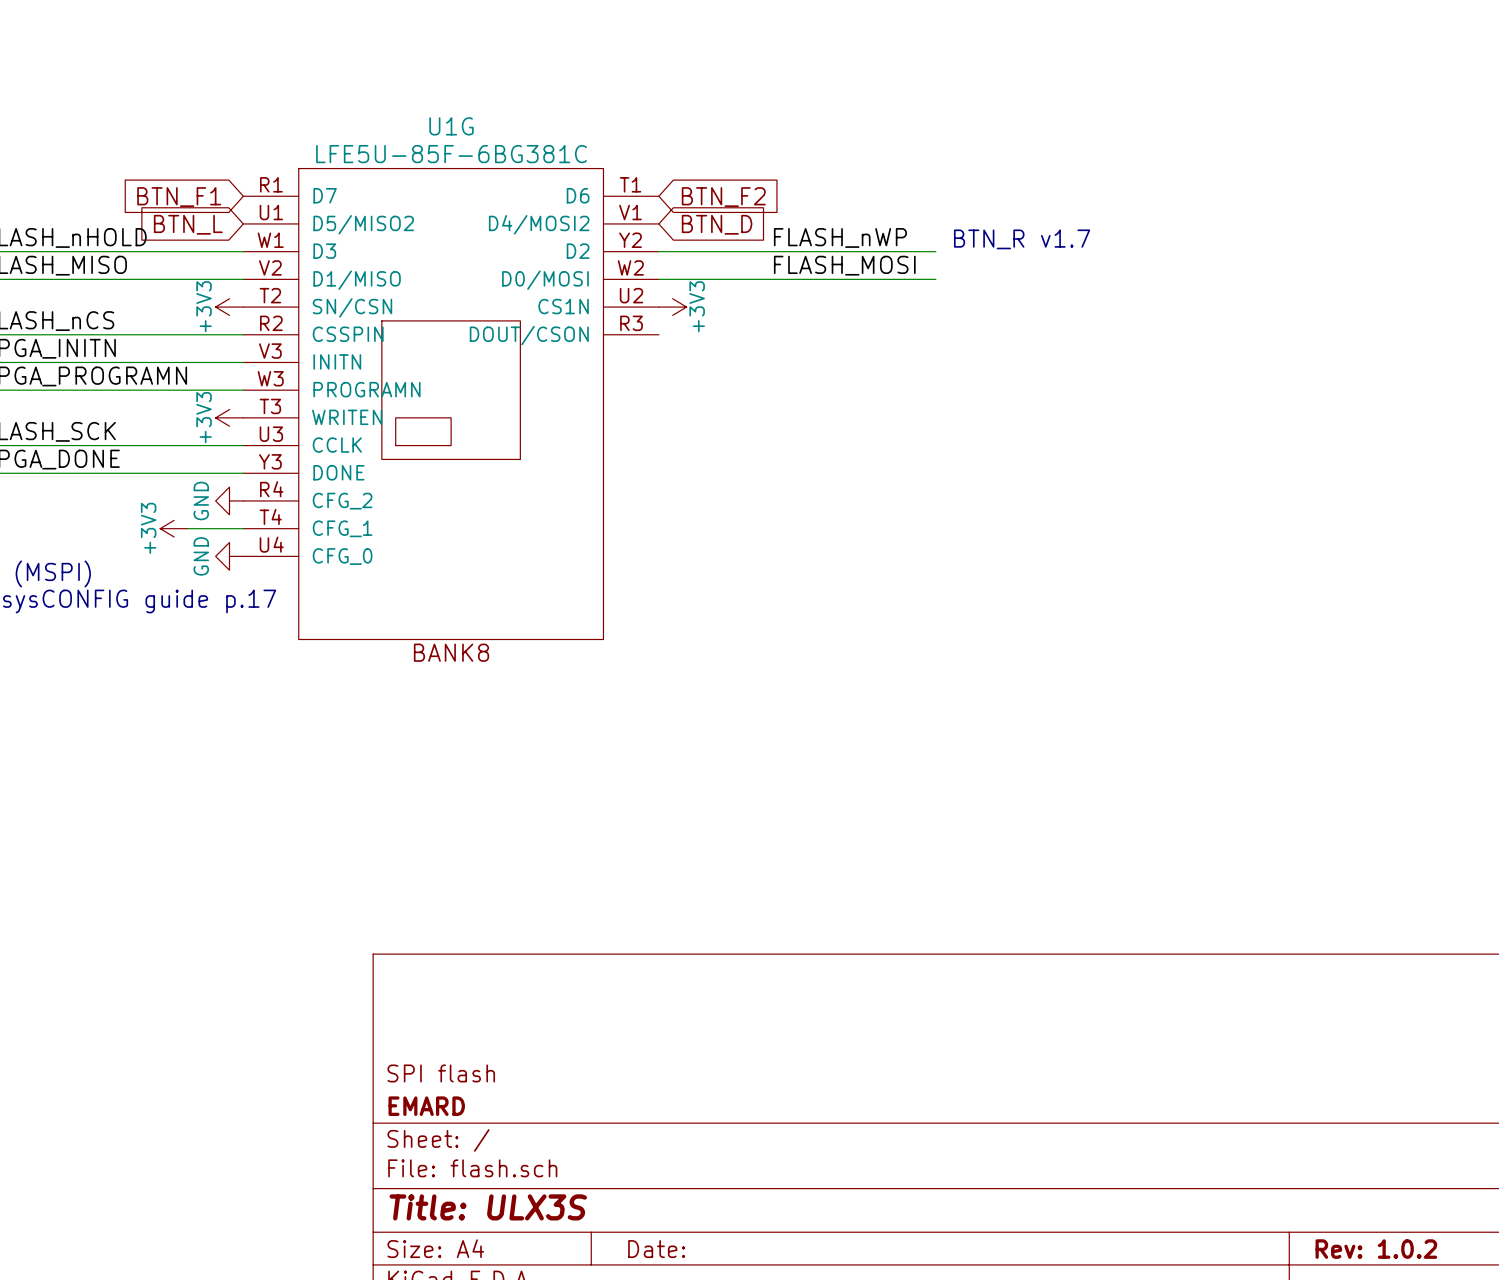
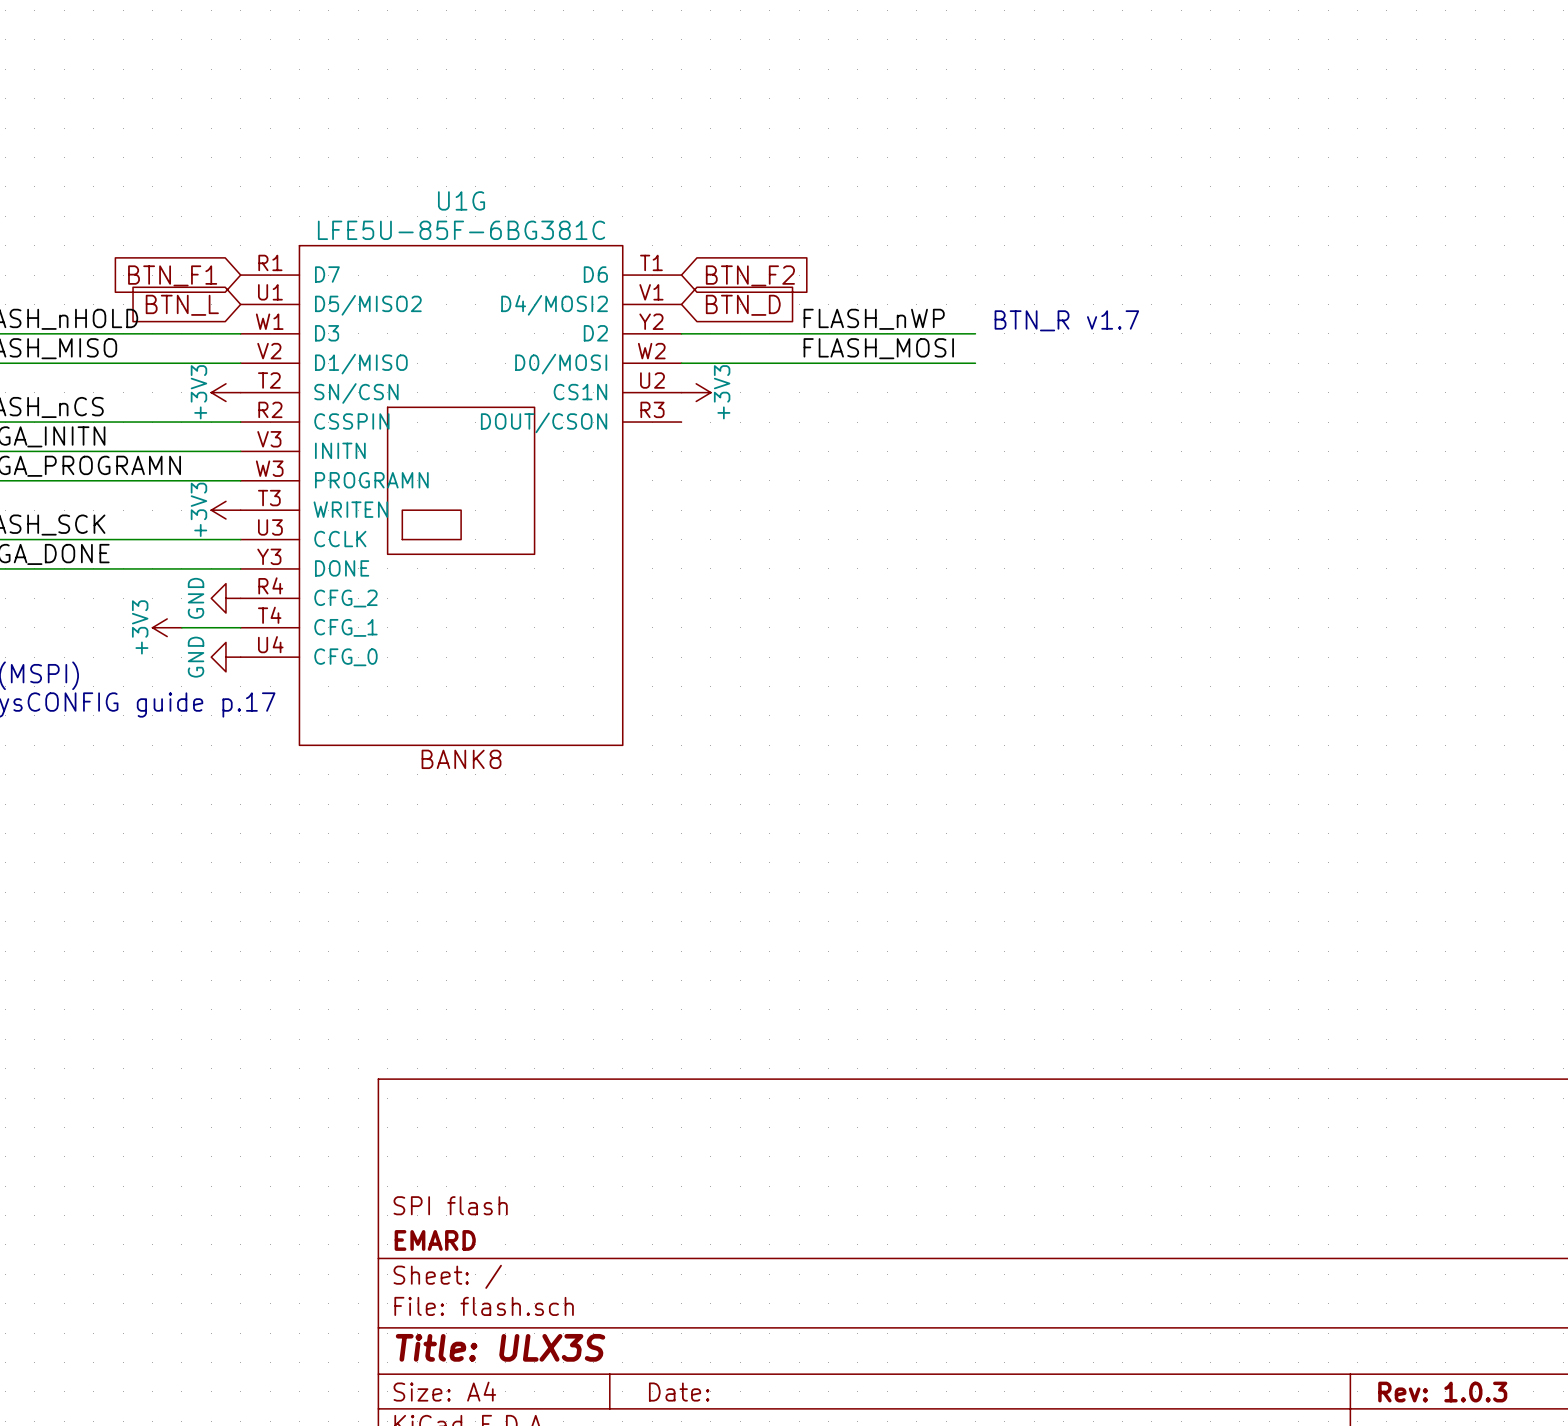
title block: Rev: 1.0.2 (1376, 1249) -> Rev: 1.0.3 (1442, 1392)

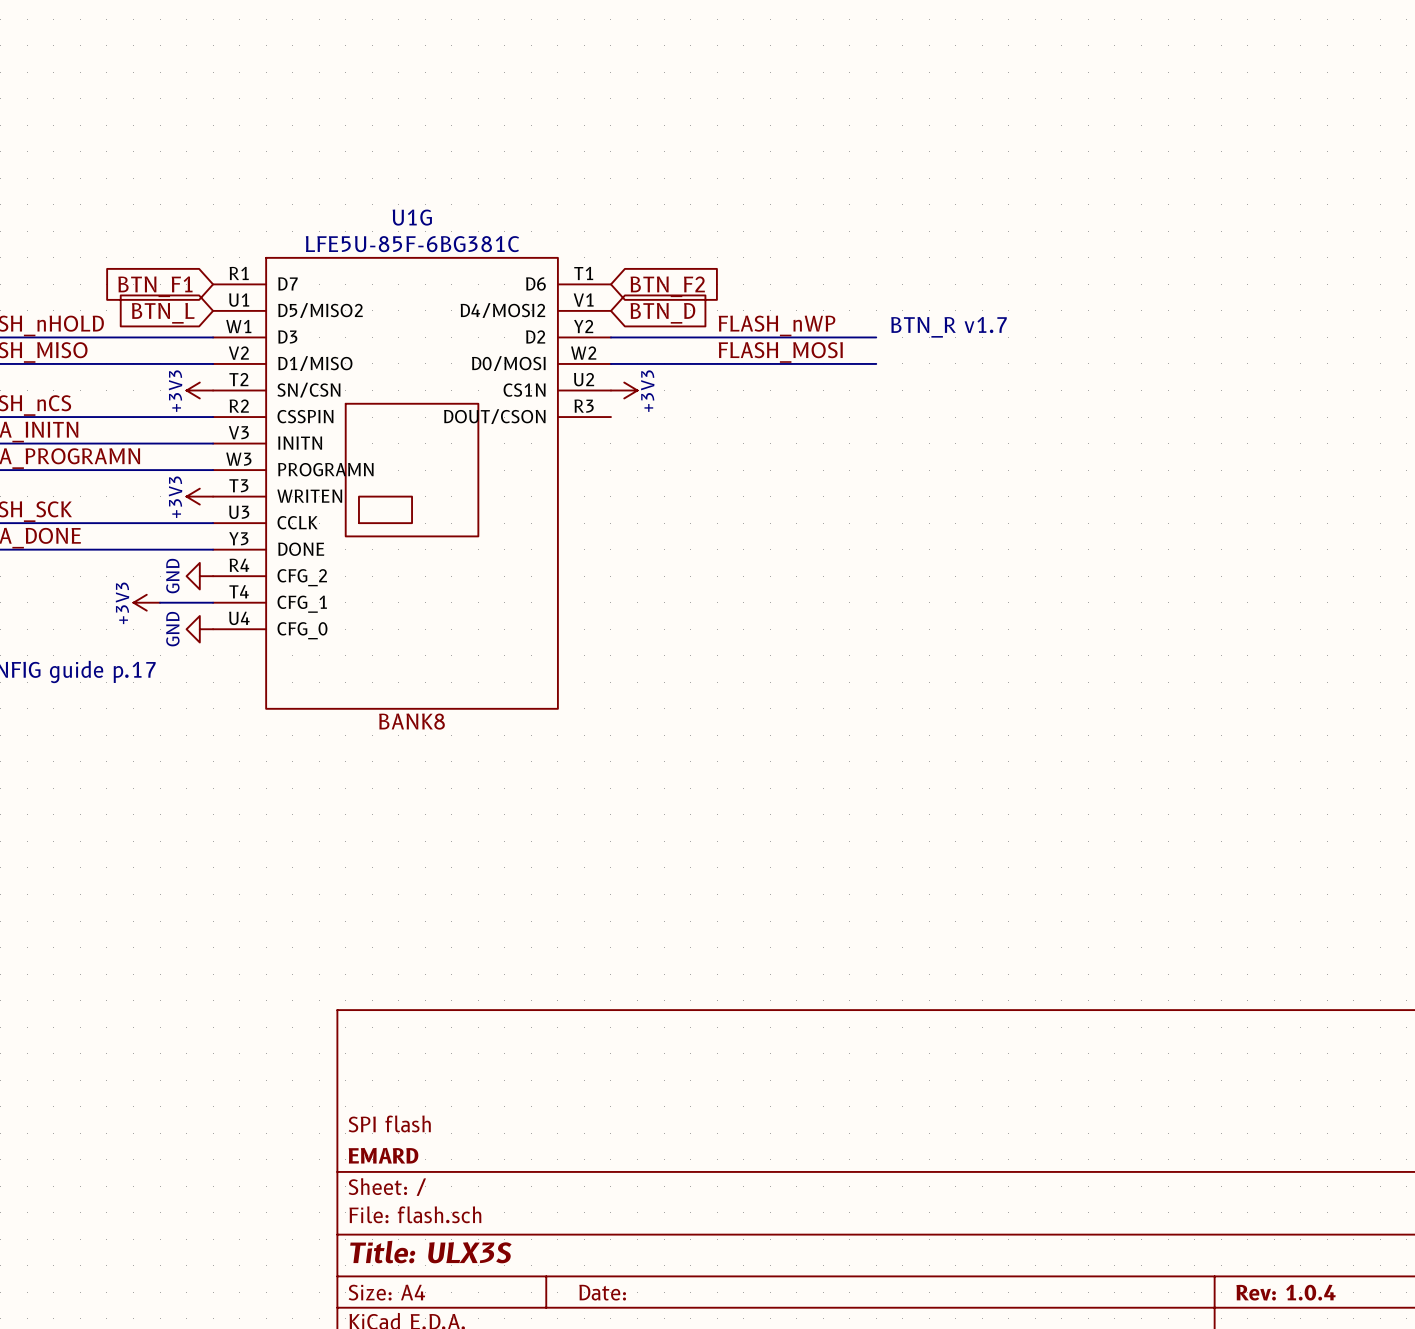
title block: Rev: 1.0.3 (1442, 1392) -> Rev: 1.0.4 (1286, 1292)

